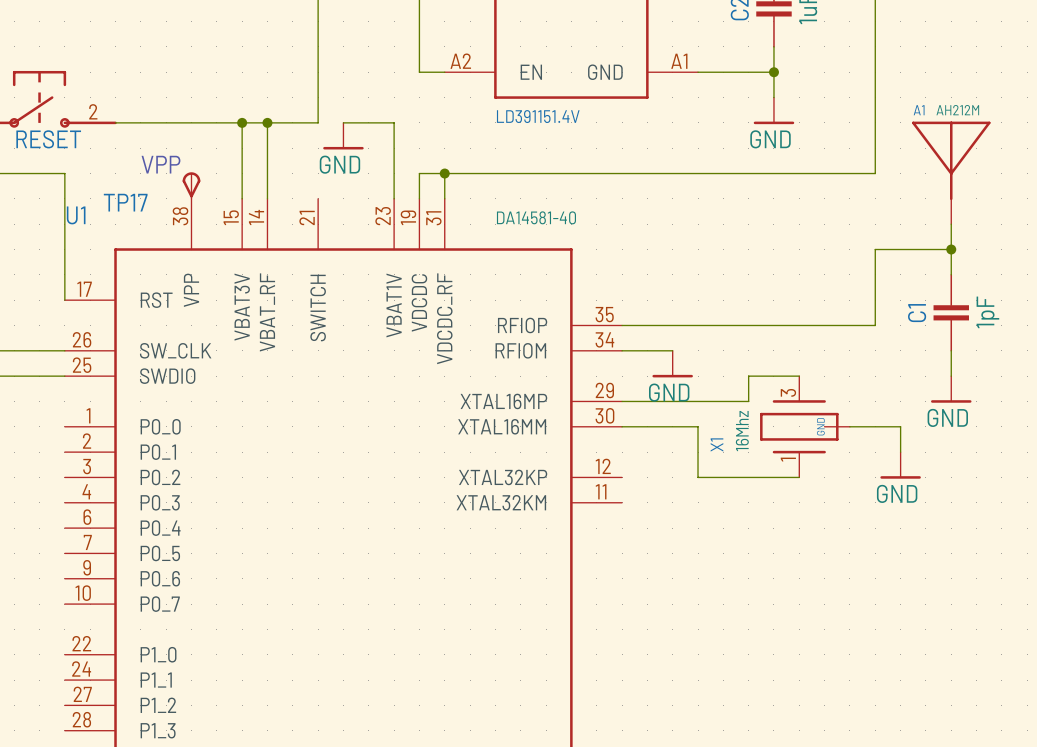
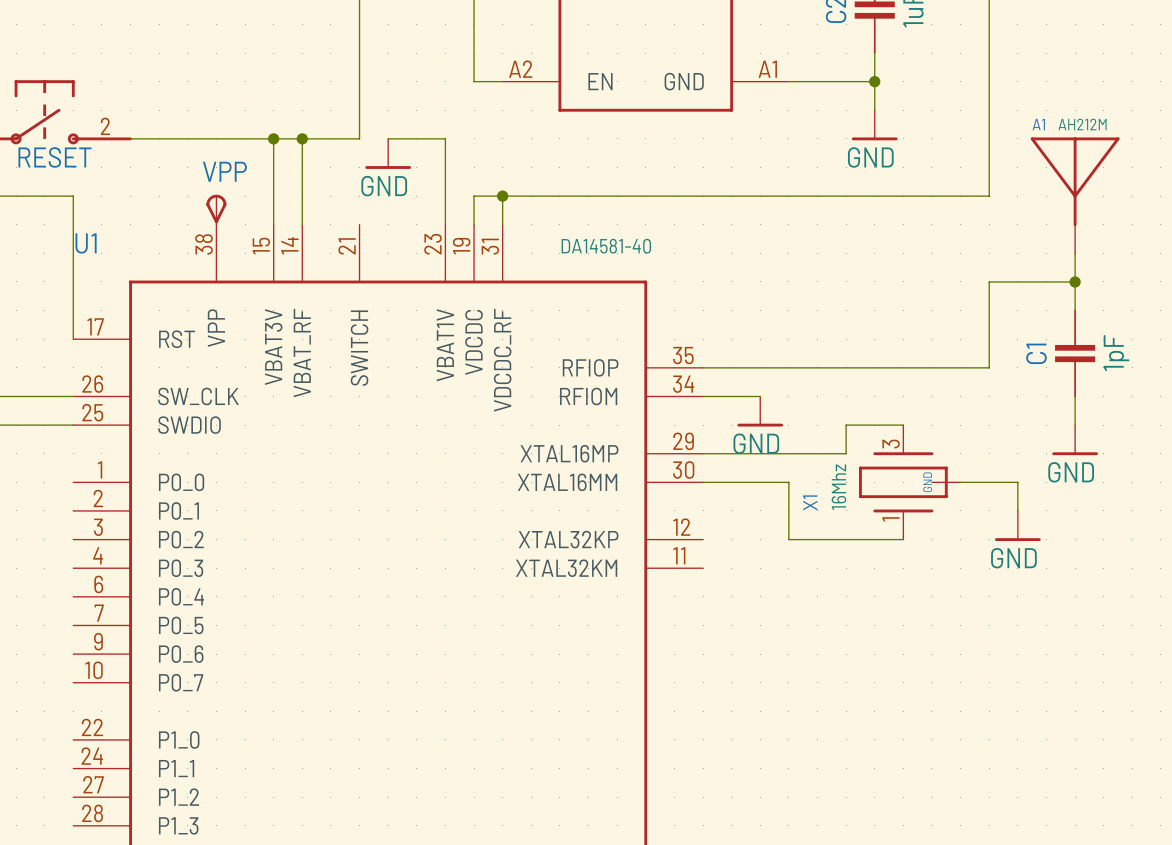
part value: LD391151.4V (538, 116) -> none
text: VPP (161, 164) -> none
TP17 name: TP17 (125, 202) -> VPP (224, 171)

